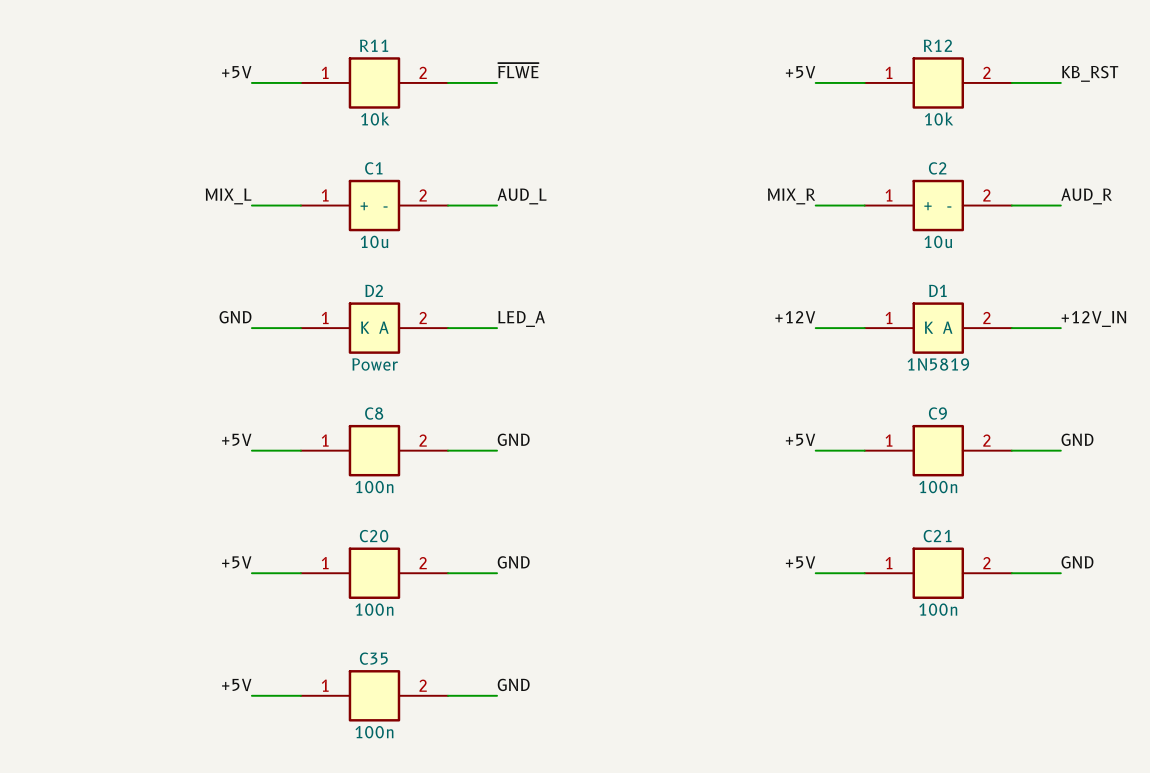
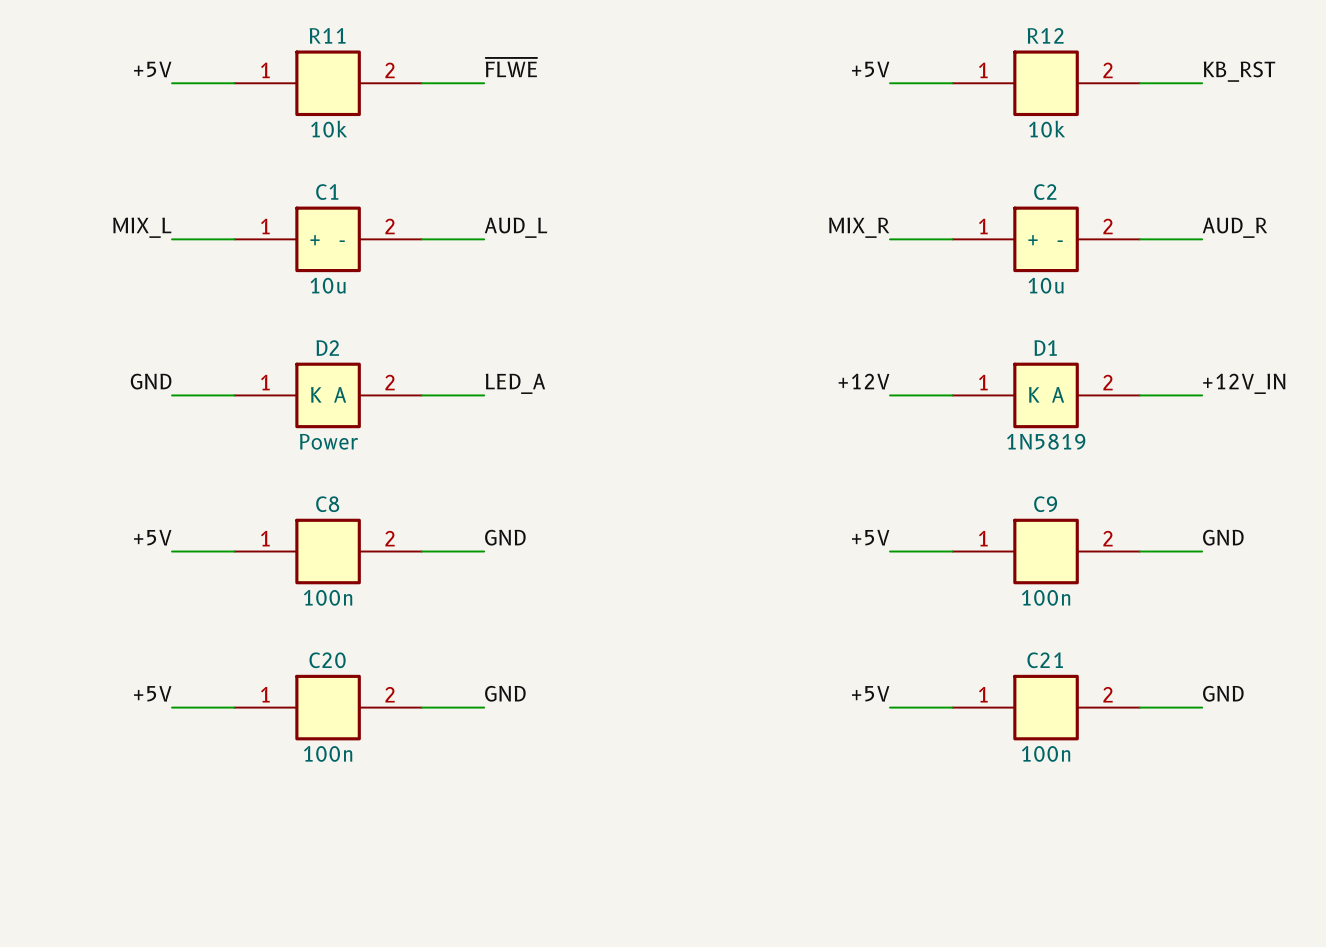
label: +5V (236, 684) -> none
label: GND (513, 684) -> none
wire: (251, 695) (300, 695) -> none
C35: 100n (374, 695) -> none
wire: (448, 695) (497, 695) -> none

